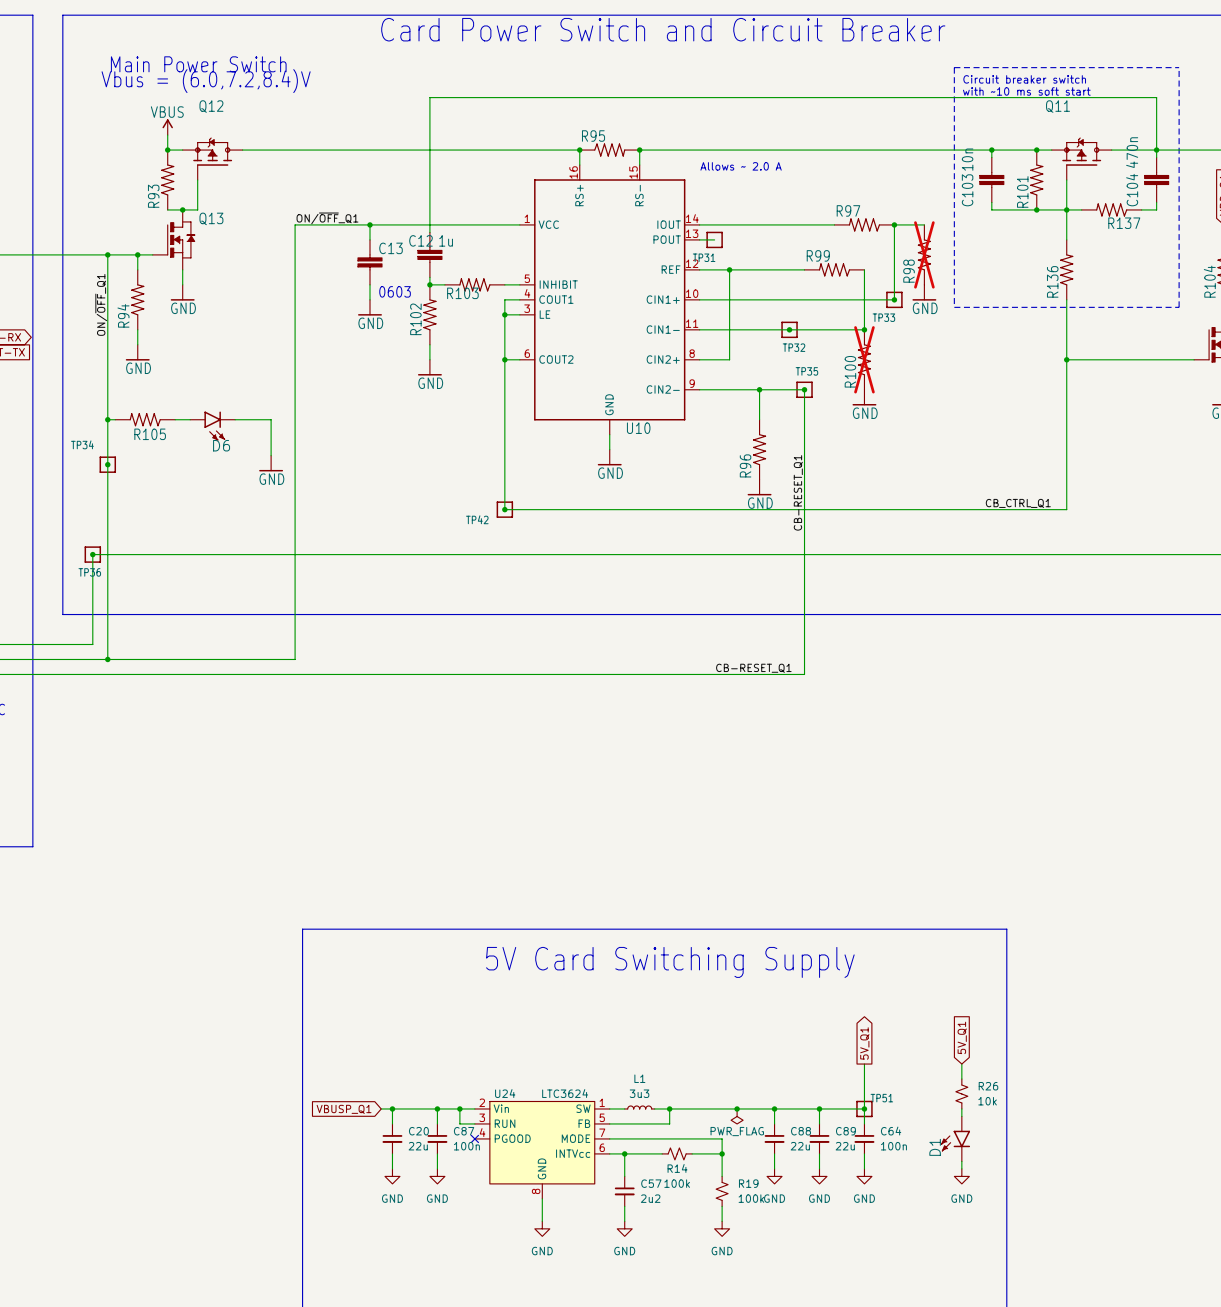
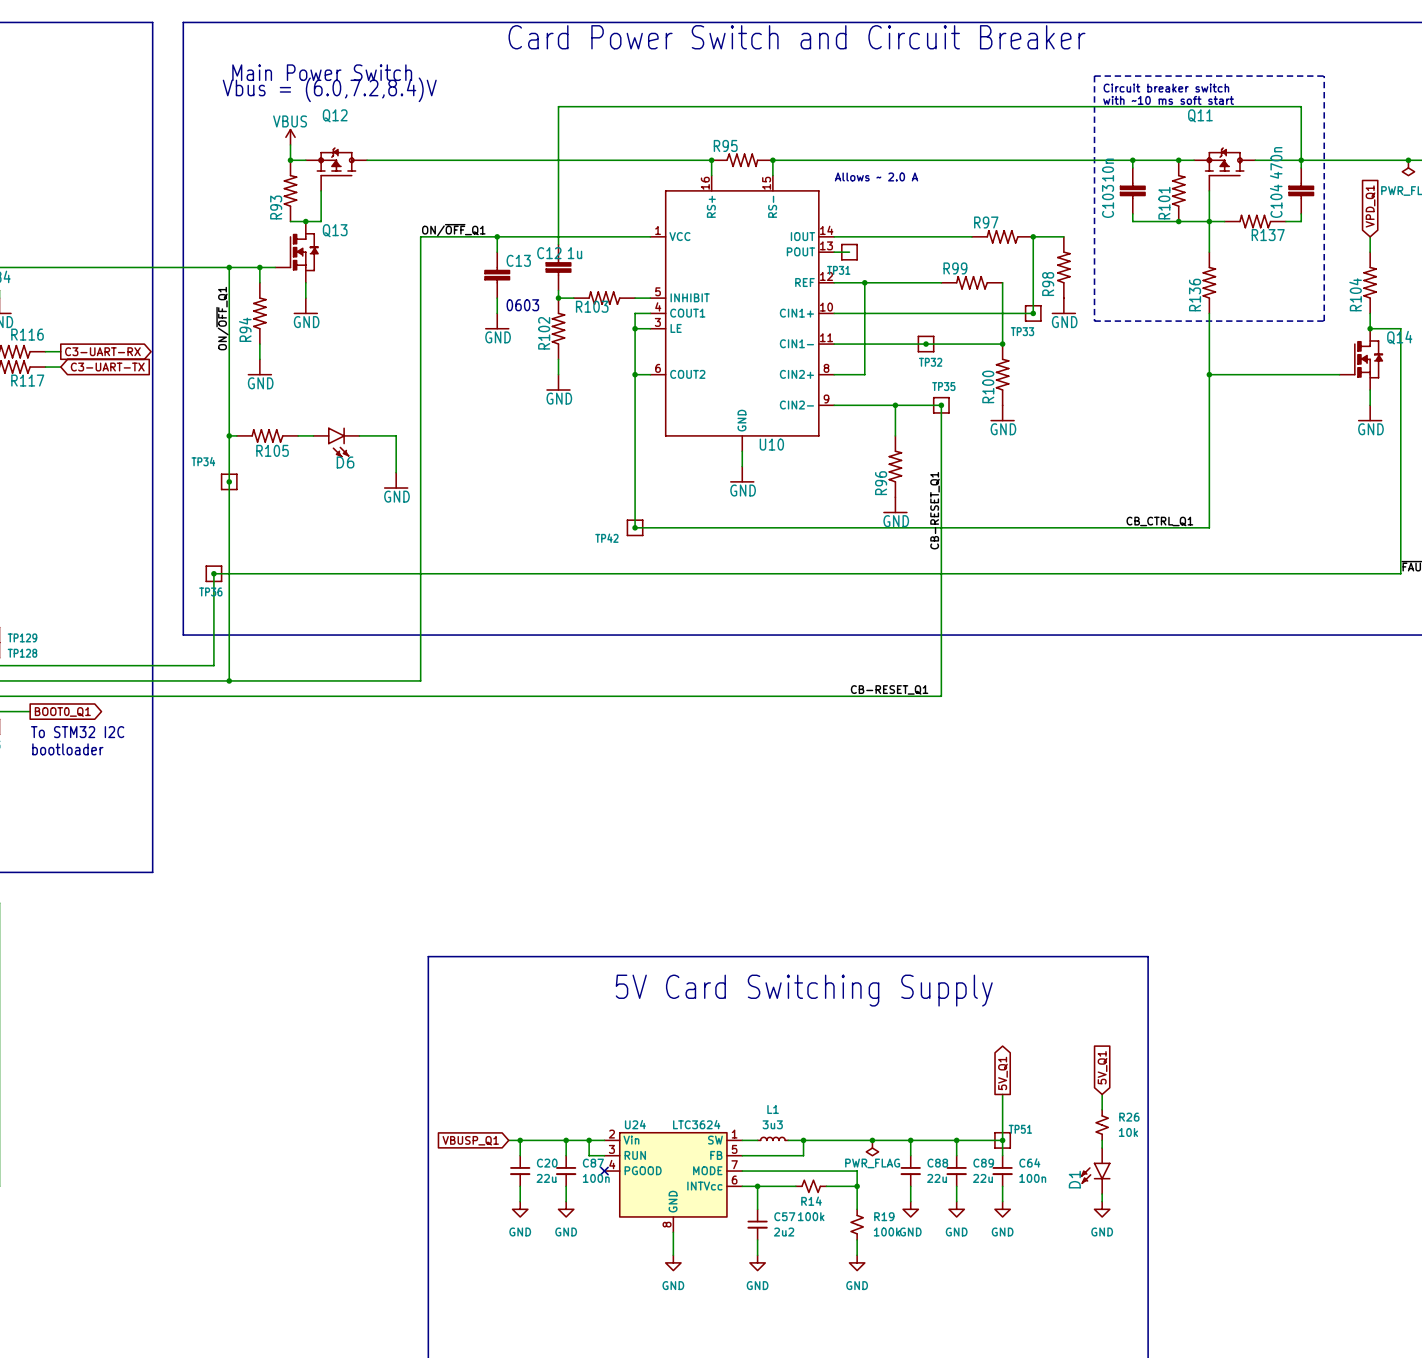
R98 do-not-place cross: (924, 254) -> none
R100 do-not-place cross: (864, 359) -> none

